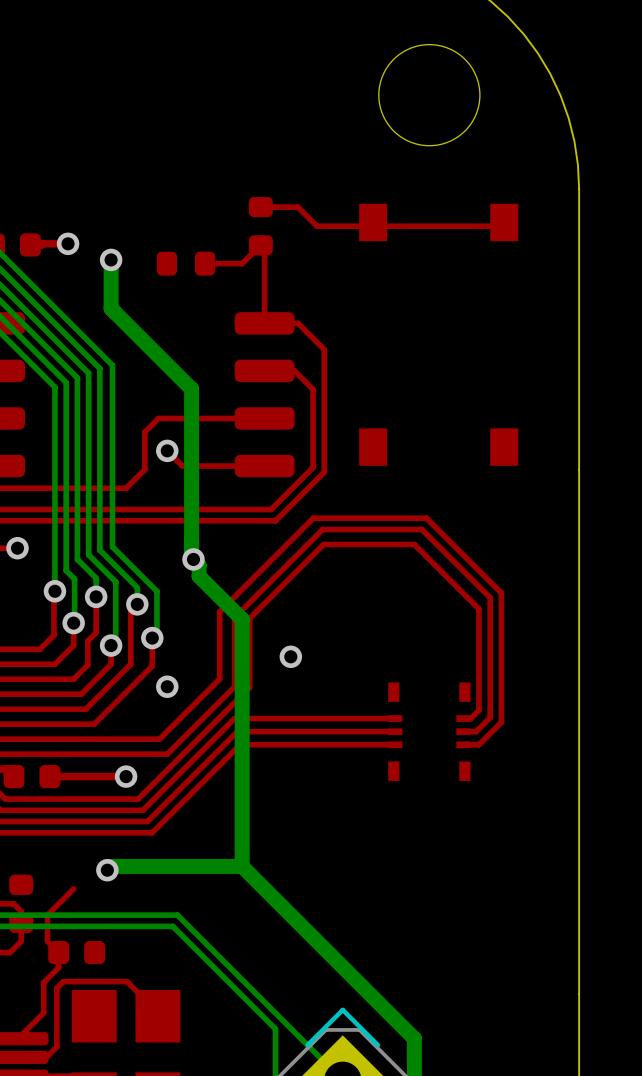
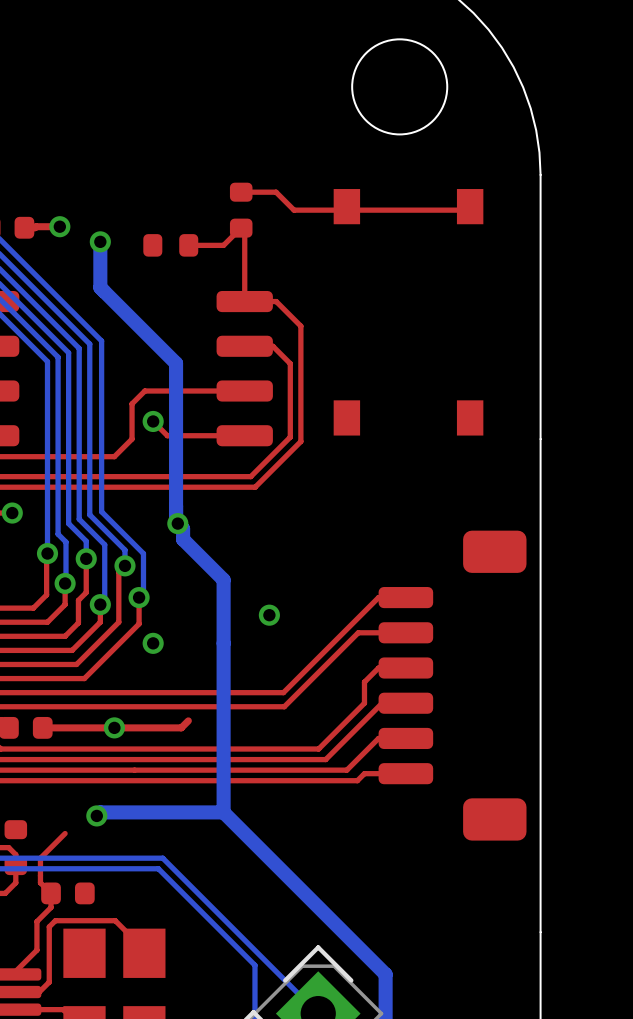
top track: (395, 718) (234, 718) (142, 810) -> (405, 703) (382, 703) (325, 759) (130, 759)
top track: (463, 718) (470, 718) (478, 710) (478, 609) (414, 544) (323, 544) (249, 618) (249, 687) (138, 799) -> (405, 668) (378, 668) (364, 682) (364, 703) (318, 749) (125, 749)
top track: (395, 731) (237, 731) (147, 821) -> (405, 738) (378, 738) (346, 770) (134, 770)
part: (429, 731) -> none
top track: (463, 731) (476, 731) (490, 717) (490, 597) (421, 529) (322, 529) (234, 617) (234, 686) (167, 754) -> (405, 632) (358, 632) (284, 706) (153, 706)
part: none -> (452, 685)
top track: (159, 739) (219, 678) (219, 611) (313, 518) (426, 518) (501, 593) (501, 722) (478, 744) (463, 744) -> (145, 692) (283, 692) (378, 597) (405, 597)
top track: (395, 744) (240, 744) (152, 832) -> (405, 773) (364, 773) (357, 780) (138, 780)
top track: none -> (188, 720) (181, 727) (114, 727)

